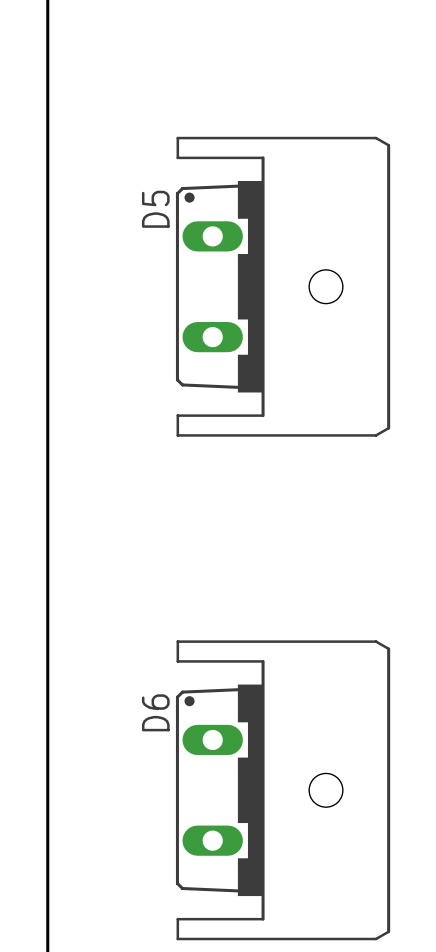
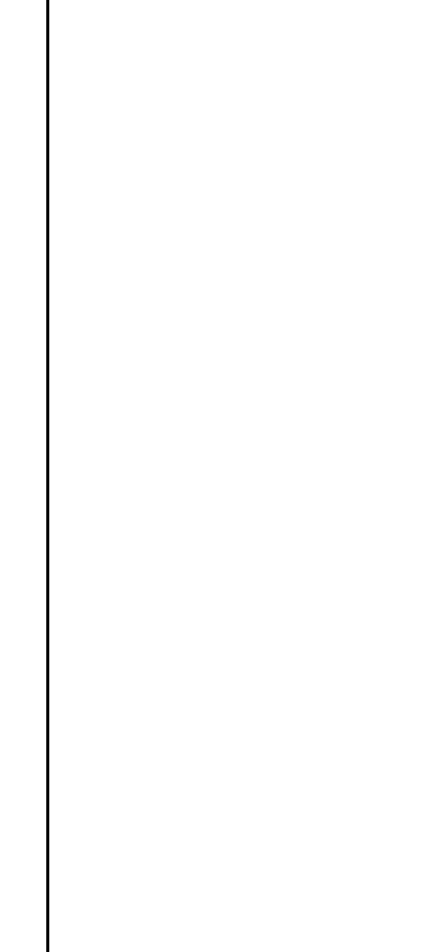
D5: (219, 286) -> none
part: (283, 286) -> none
D6: (219, 790) -> none
part: (283, 790) -> none

